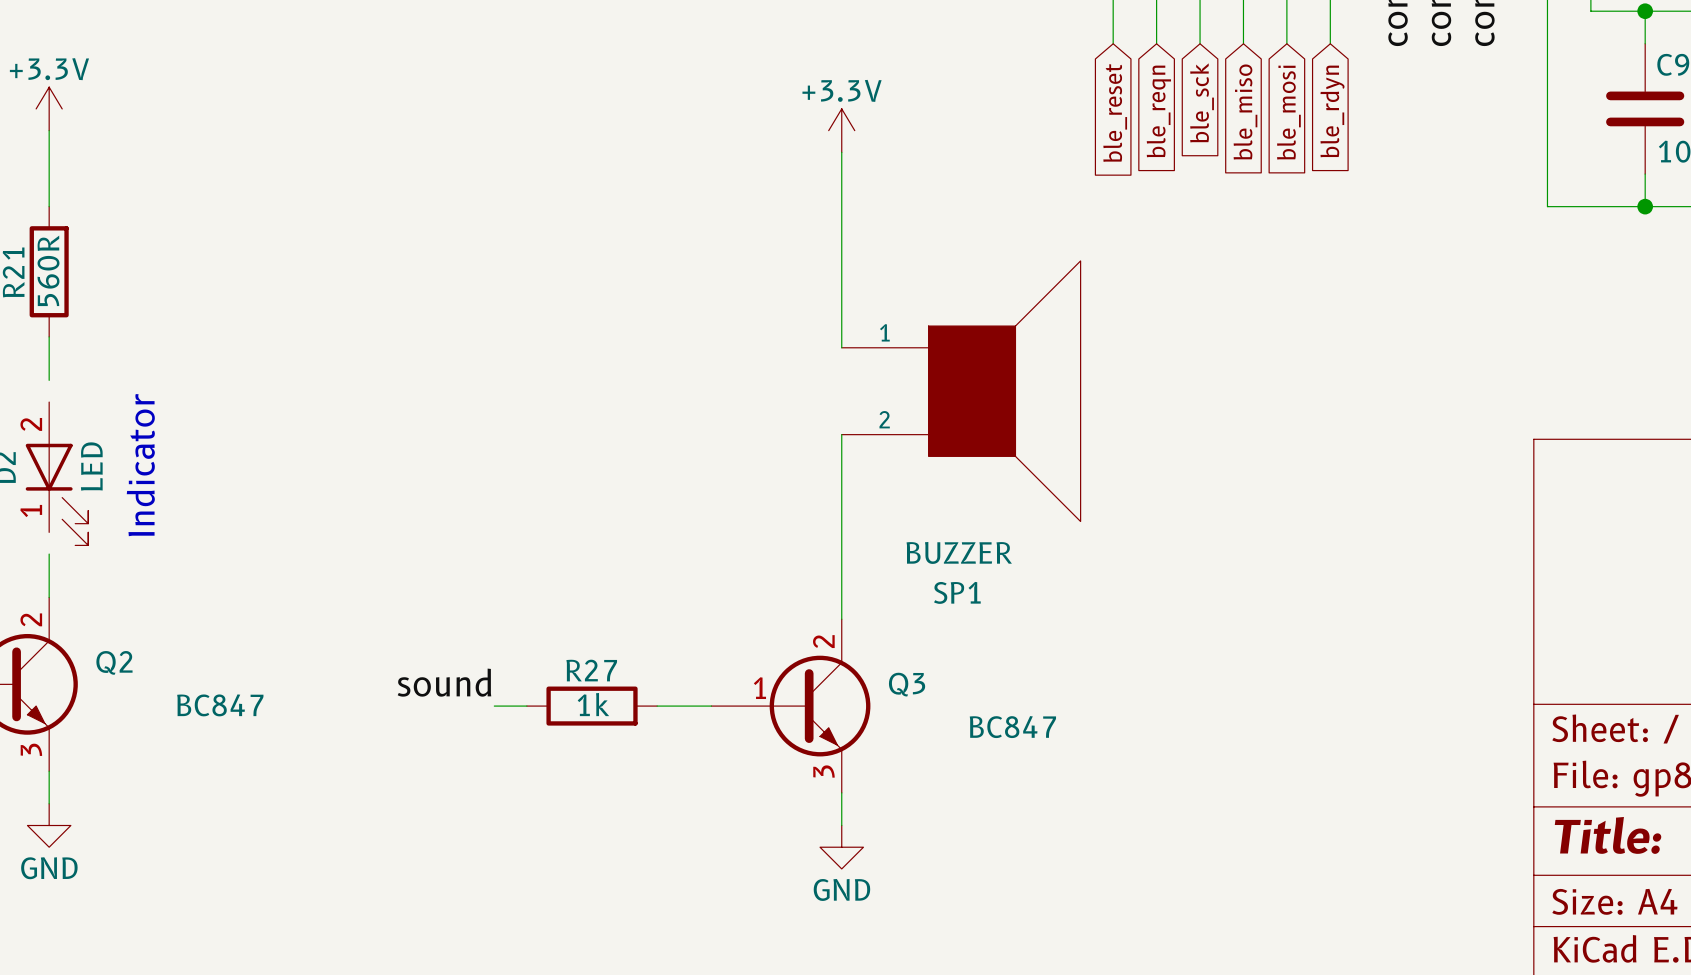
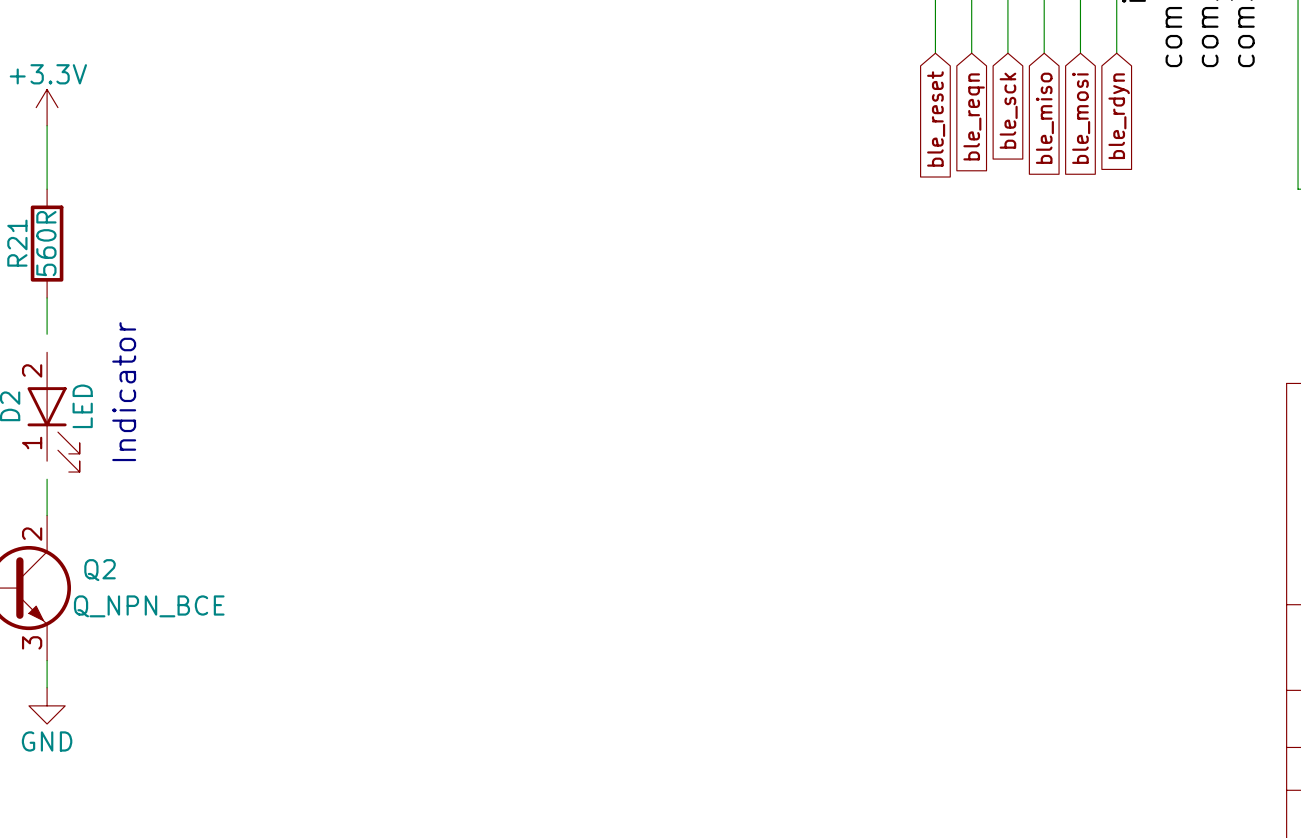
power symbol: +3.3V (841, 130) -> none
wire: (841, 152) (841, 347) -> none
SP1: BUZZER (961, 391) -> none
wire: (841, 434) (841, 619) -> none
label: sound (444, 682) -> none
Q2 value: BC847 (220, 705) -> Q_NPN_BCE (149, 606)
wire: (494, 706) (526, 706) -> none
R27: 1k (592, 706) -> none
wire: (657, 706) (711, 706) -> none
Q3: BC847 (790, 706) -> none
wire: (841, 792) (841, 825) -> none
power symbol: GND (841, 847) -> none

